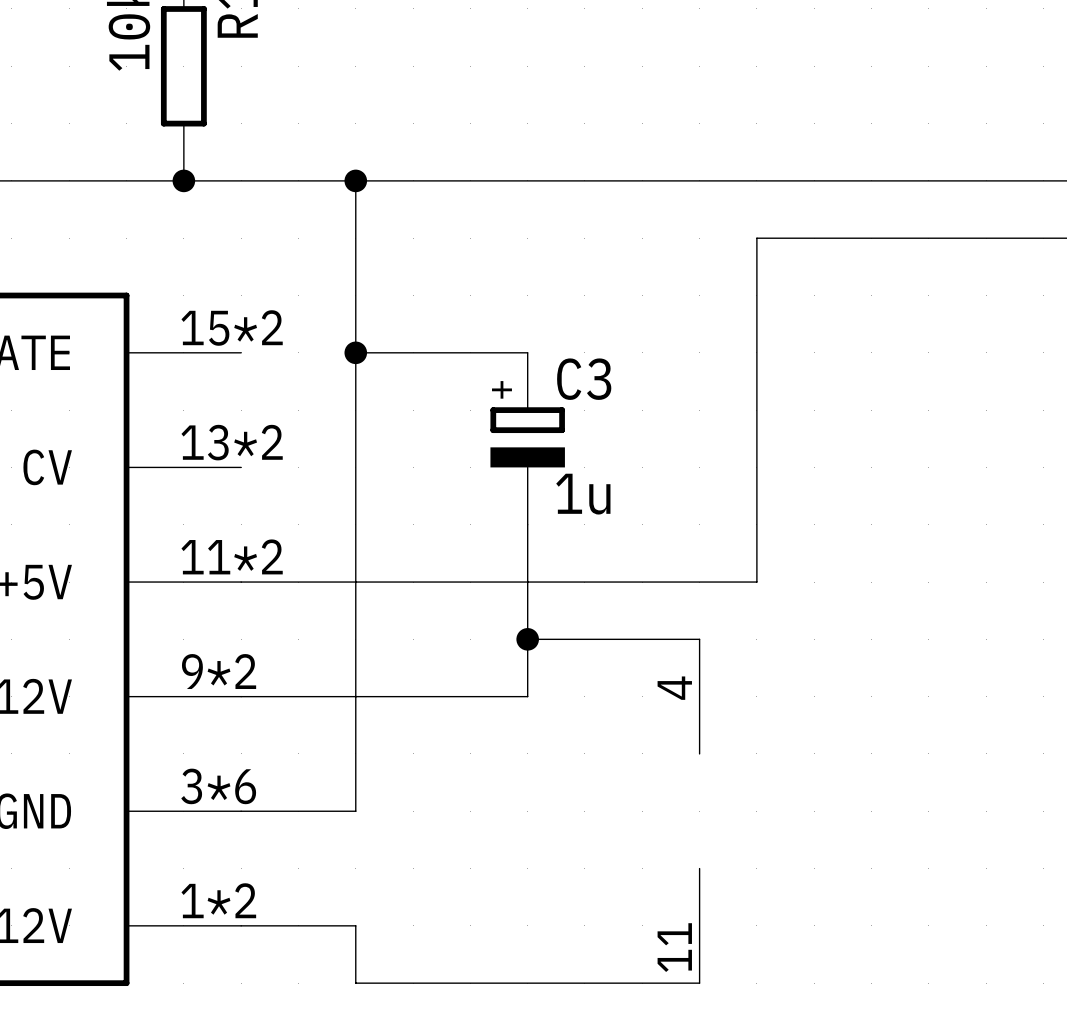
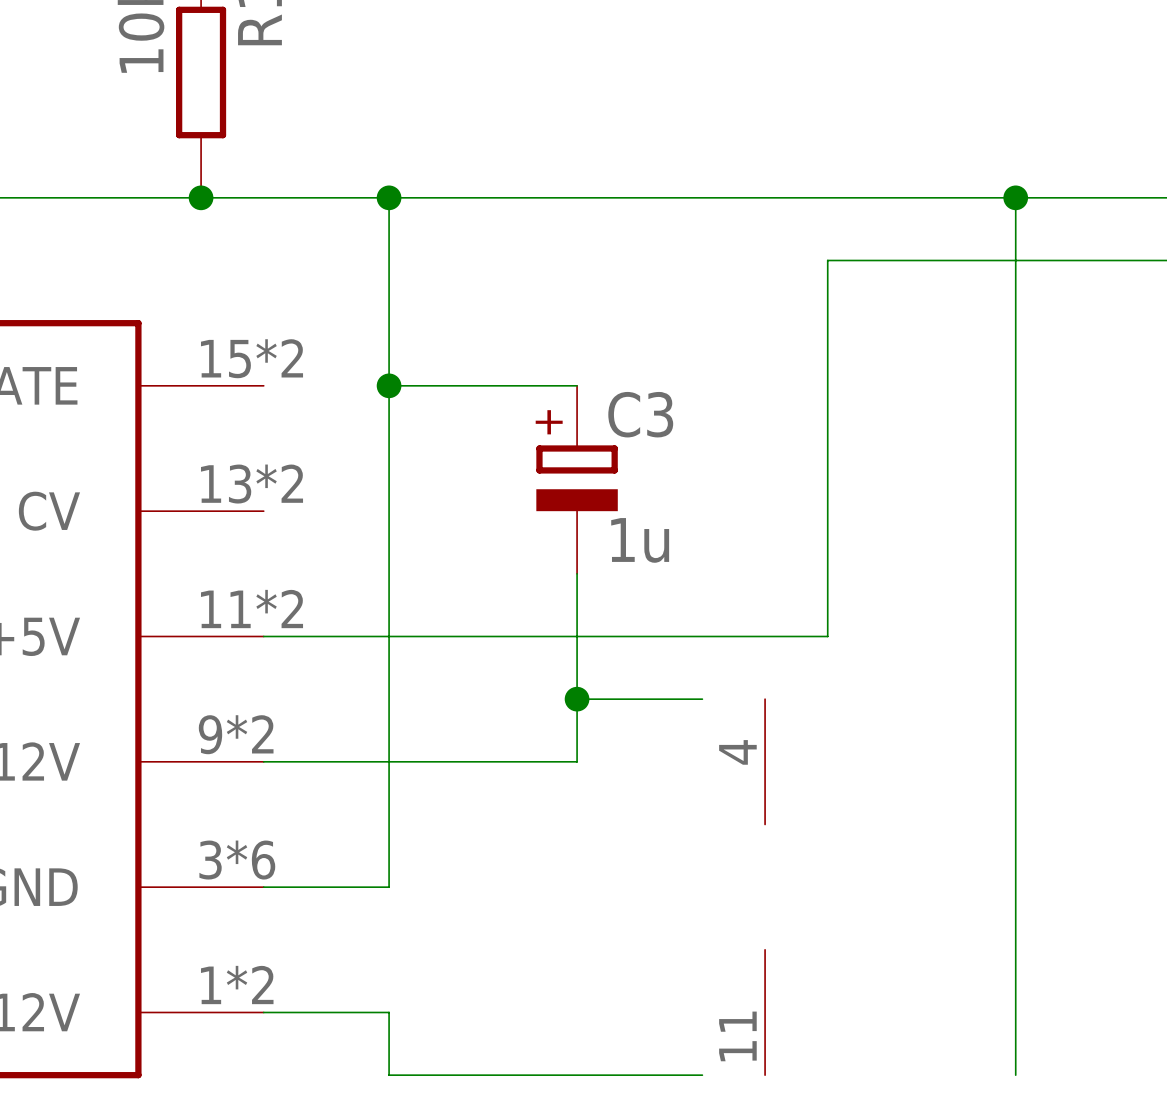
wire: none -> (1015, 197) (1015, 1075)
junction: none -> (1015, 197)
wire: (642, 639) (699, 639) -> none
wire: (642, 983) (699, 983) -> none

